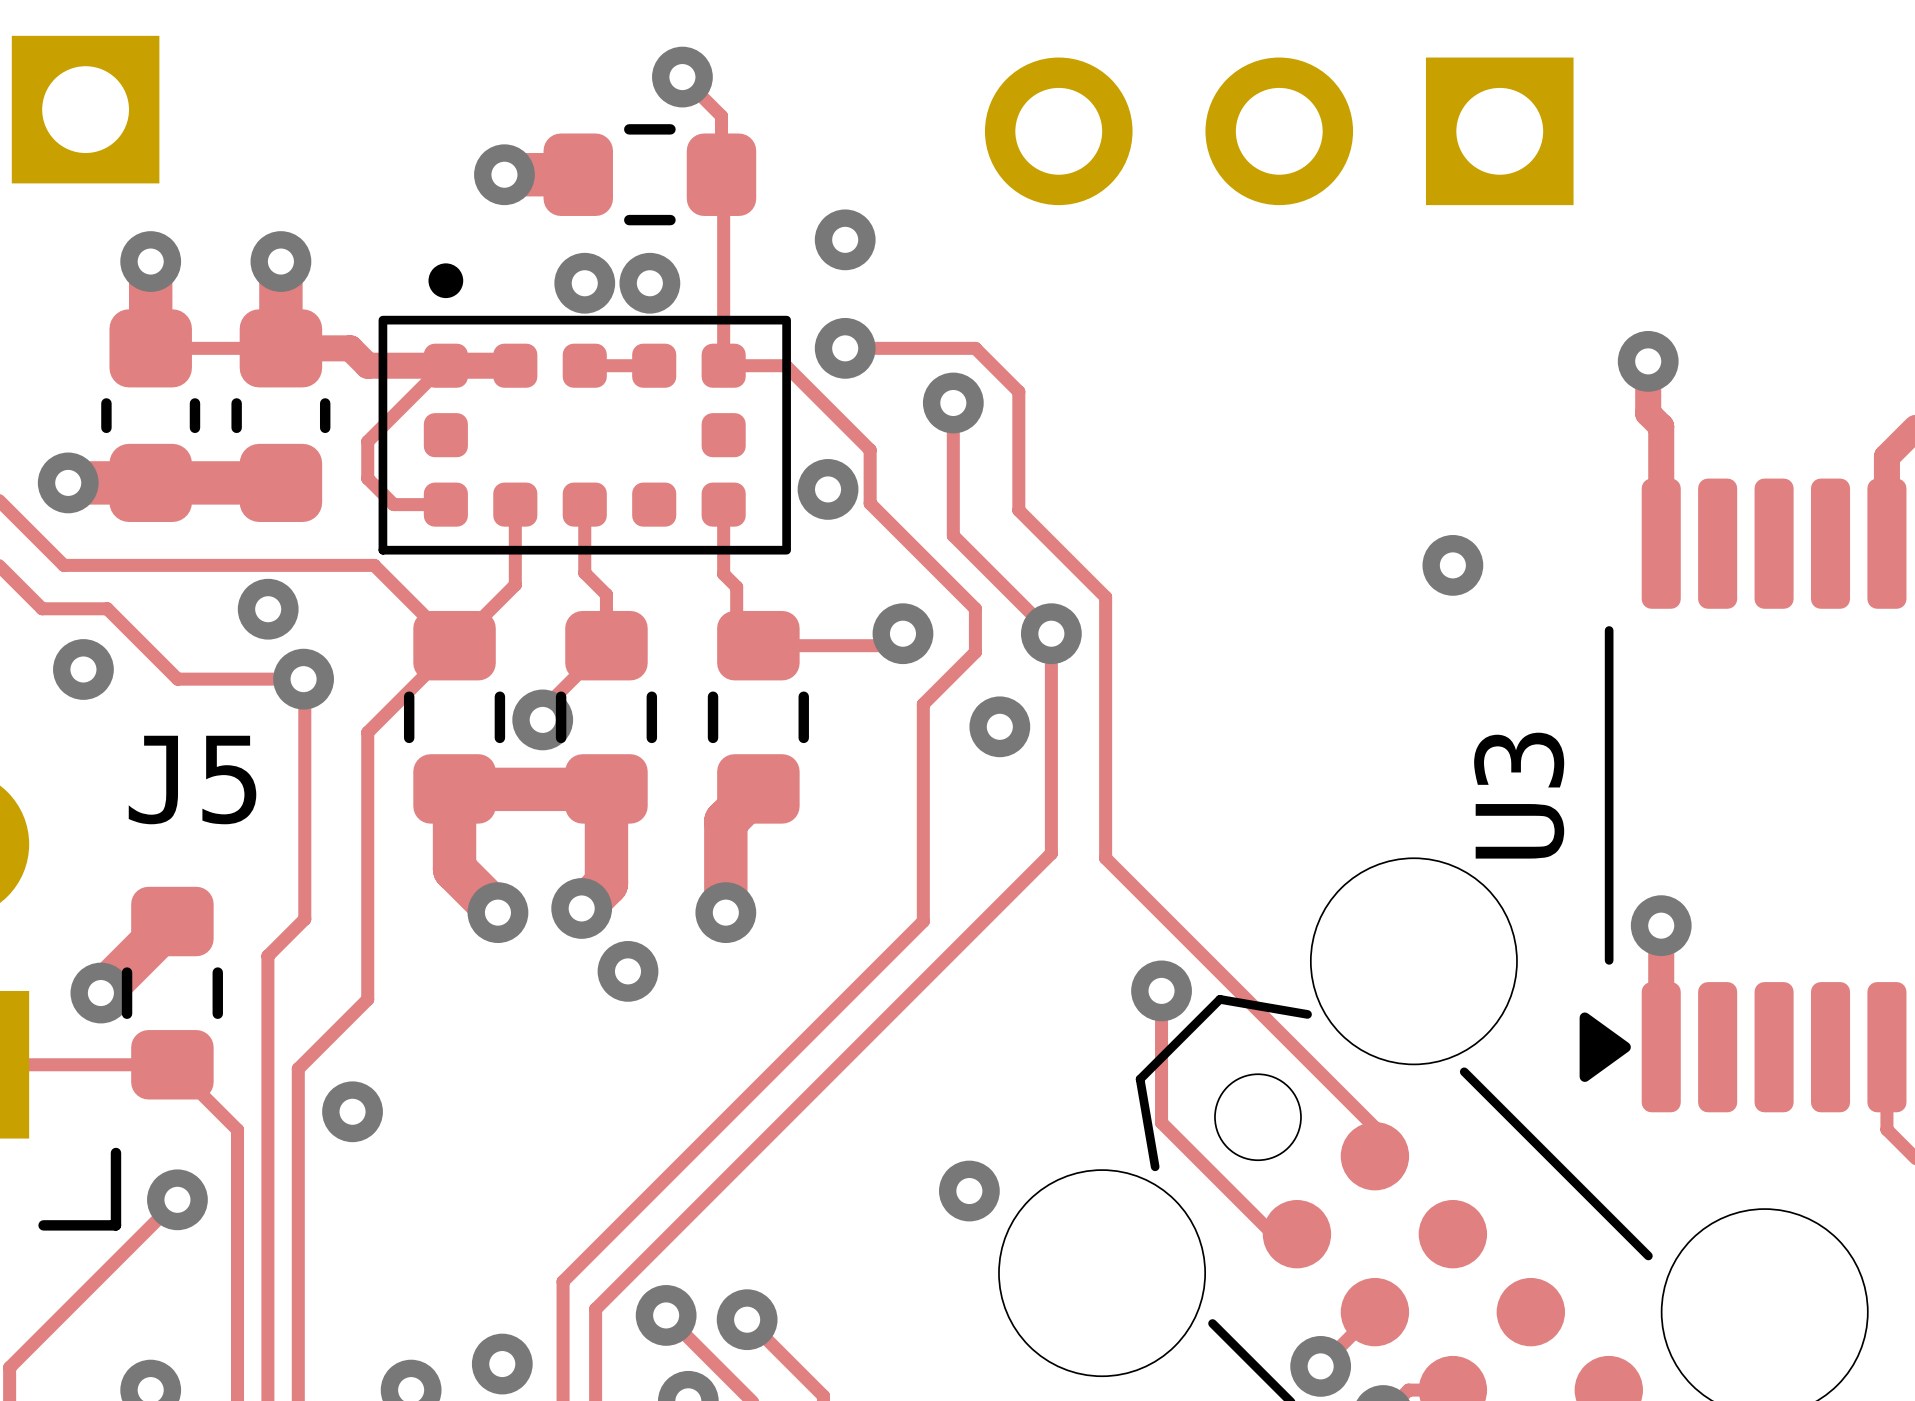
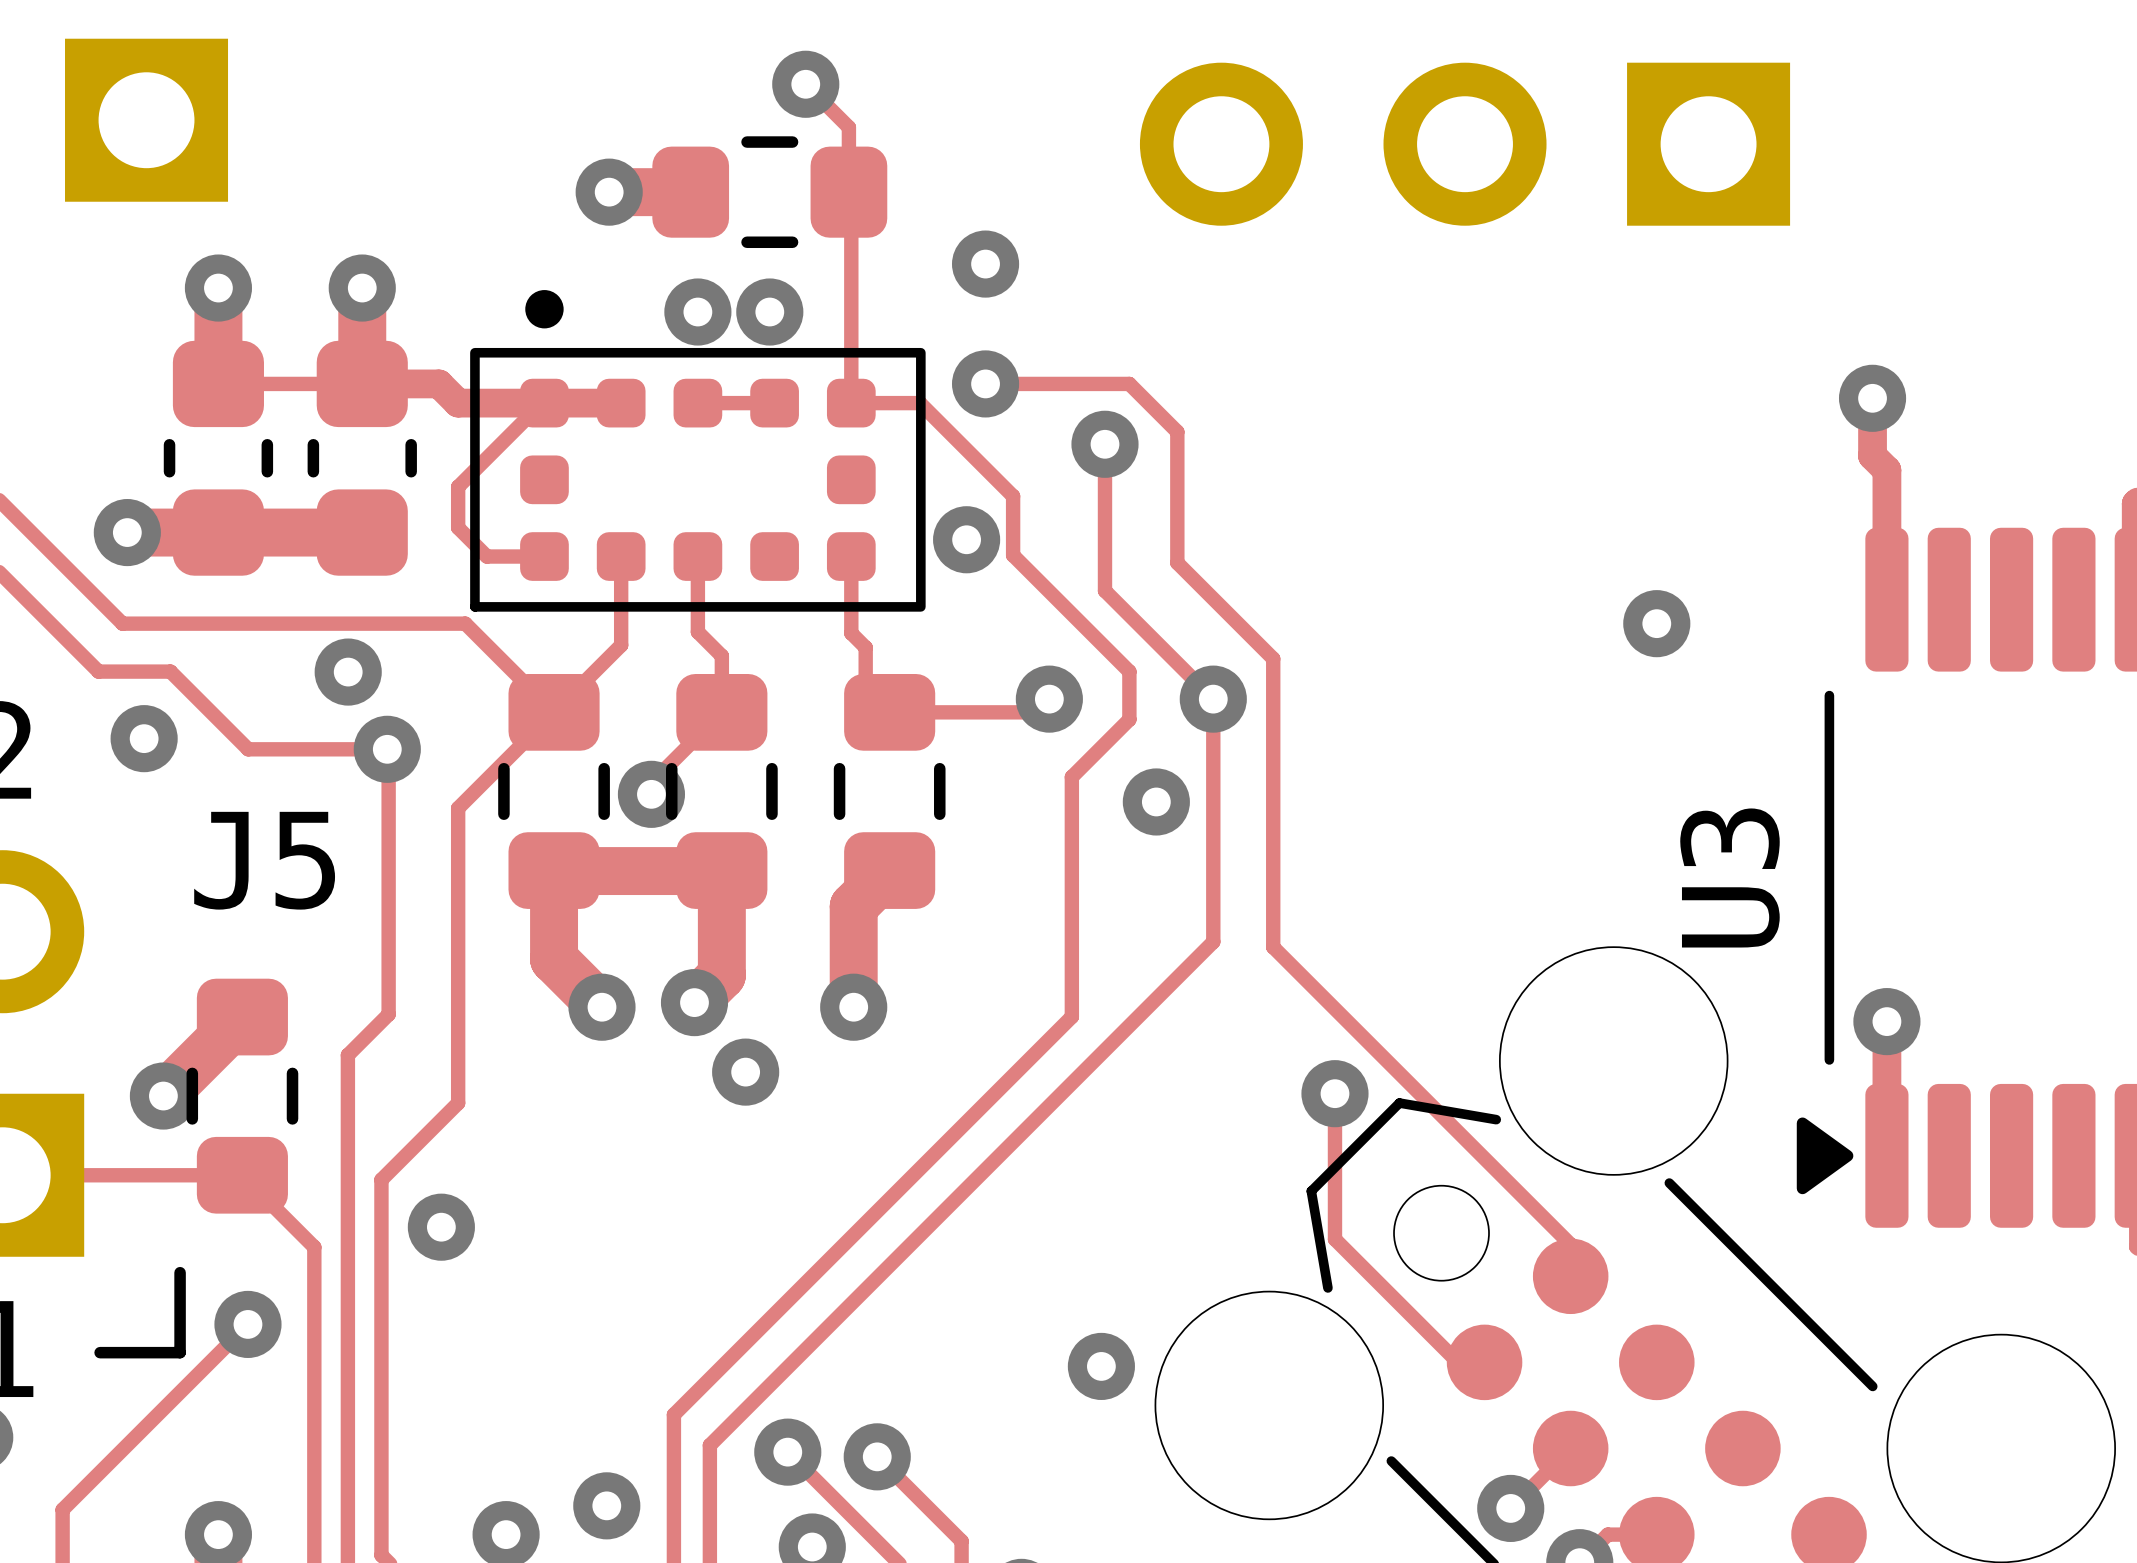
via position: (969, 1191) -> (1101, 1366)

